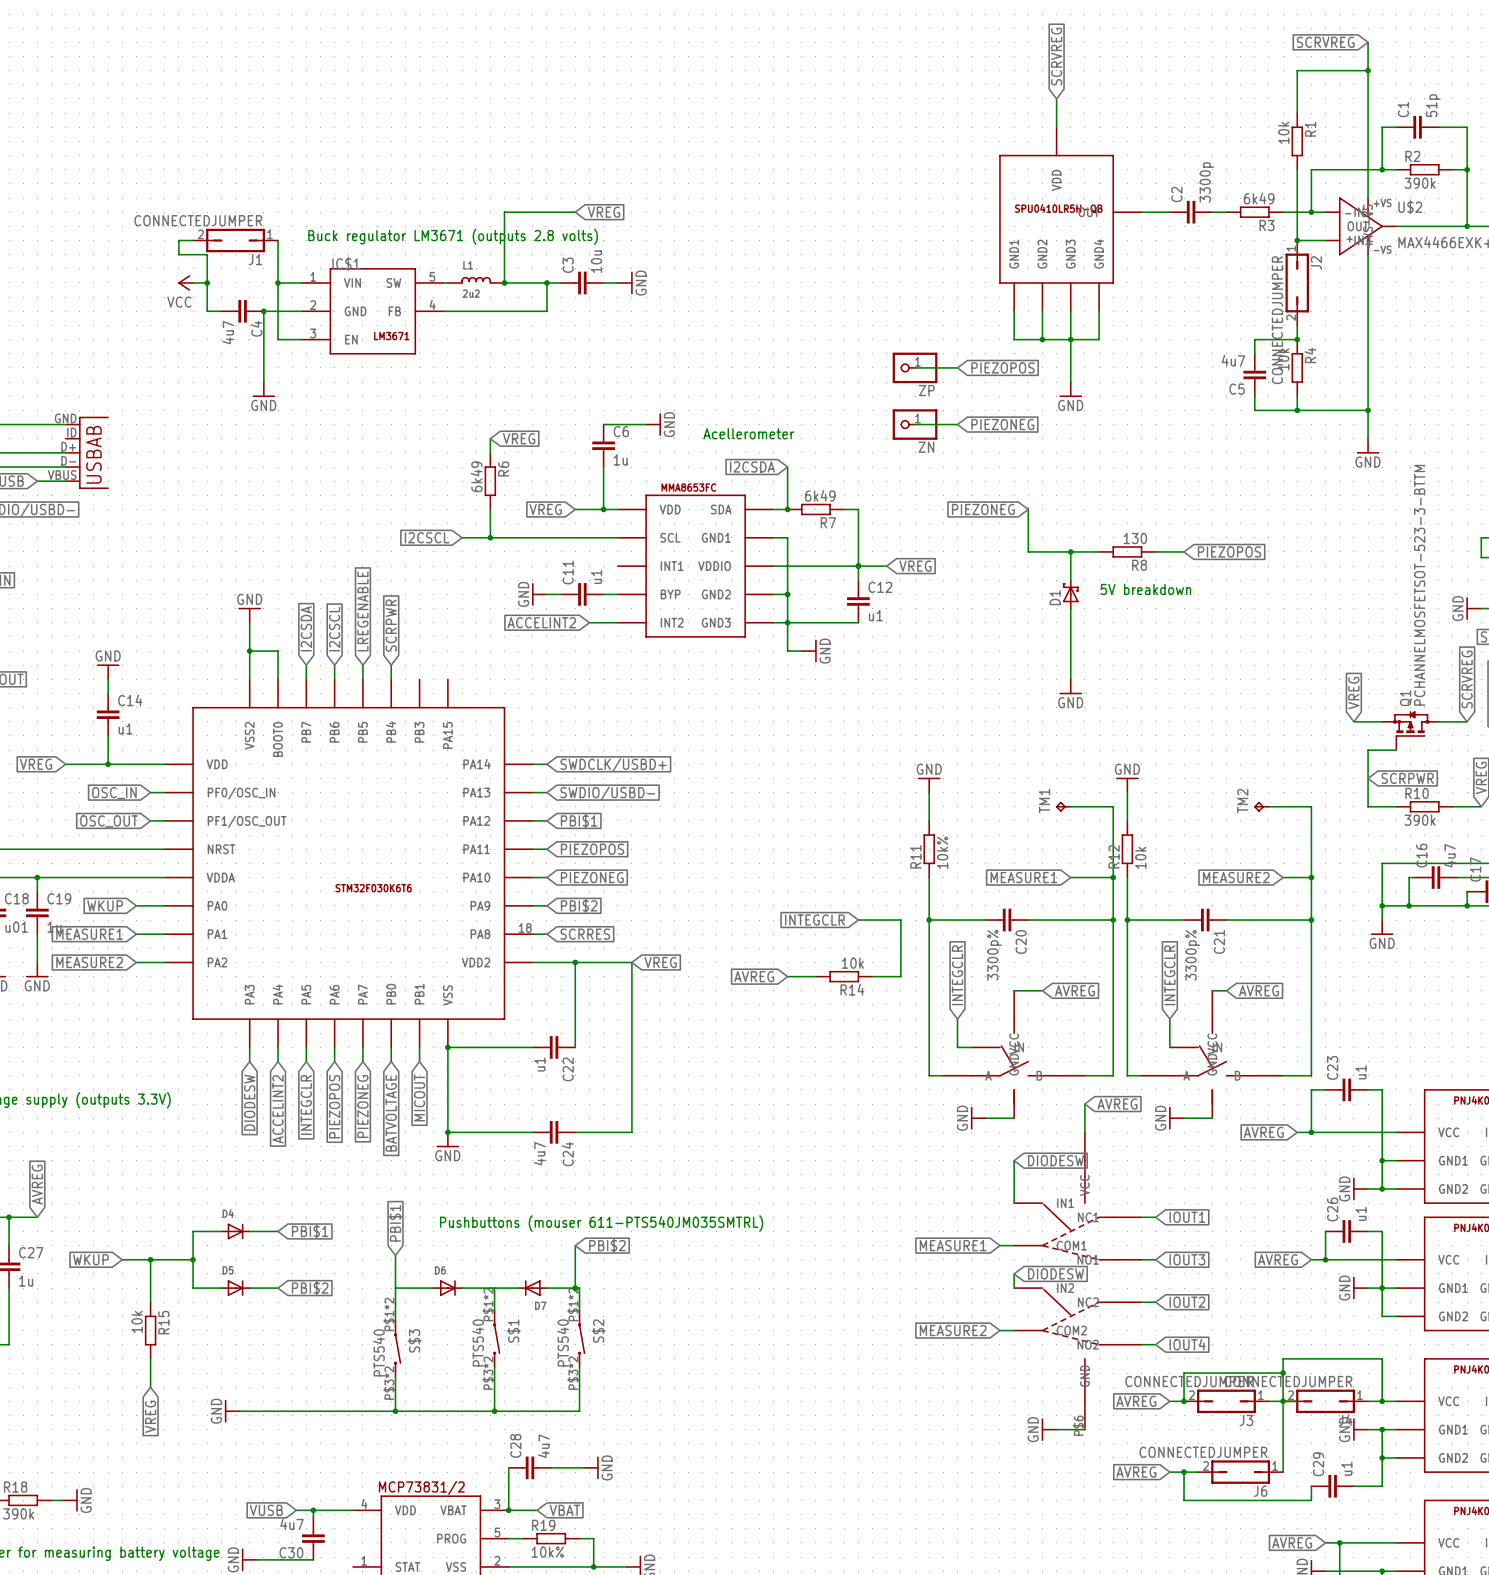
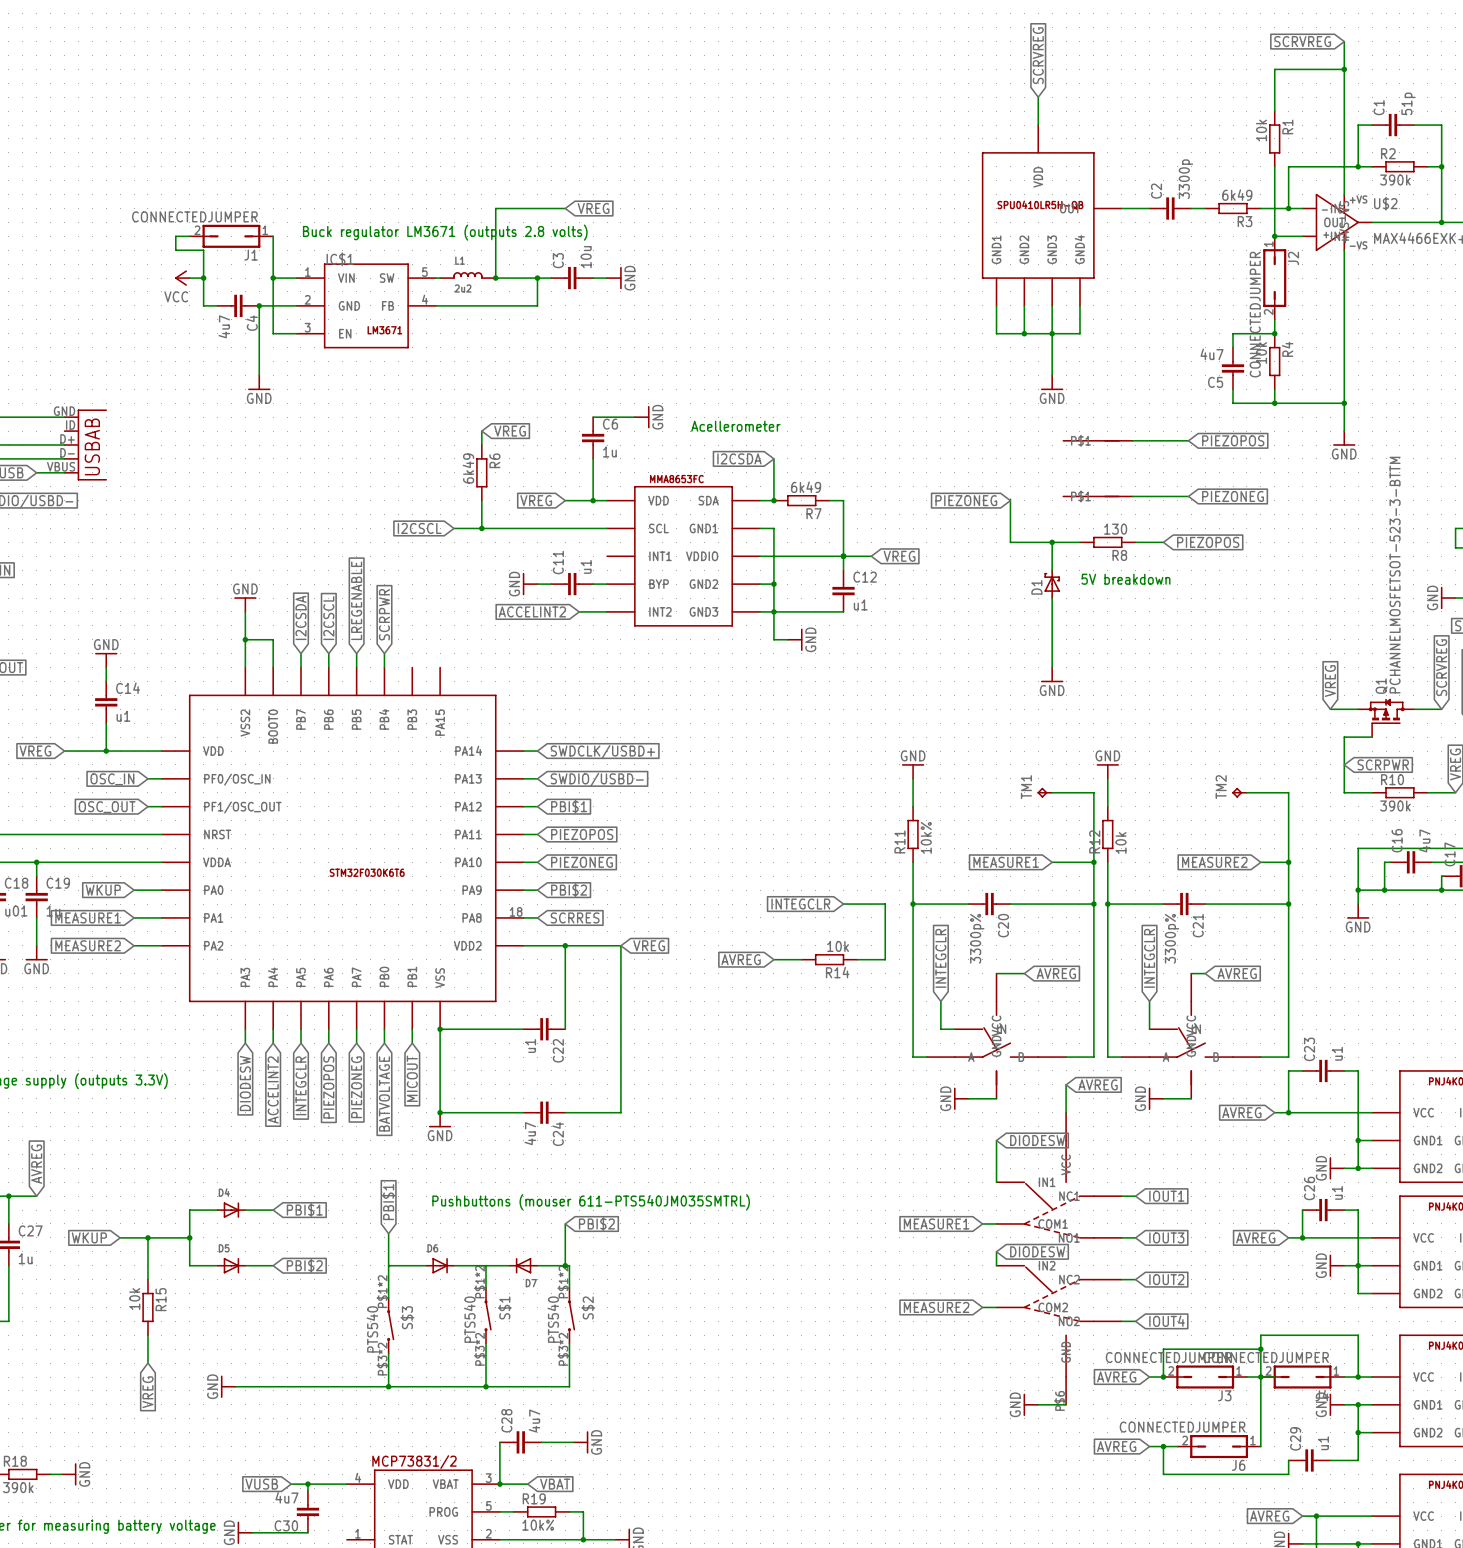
wire: (915, 367) (957, 367) -> none
ZP: (915, 367) -> none
global label: PIEZOPOS (1003, 367) -> none
wire: (915, 424) (957, 424) -> none
ZN: (915, 424) -> none
global label: PIEZONEG (1002, 424) -> none
part: none -> (1097, 440)
wire: none -> (1132, 440) (1188, 440)
global label: none -> PIEZOPOS (1233, 440)
part: none -> (1097, 496)
wire: none -> (1132, 496) (1188, 496)
global label: none -> PIEZONEG (1233, 496)

